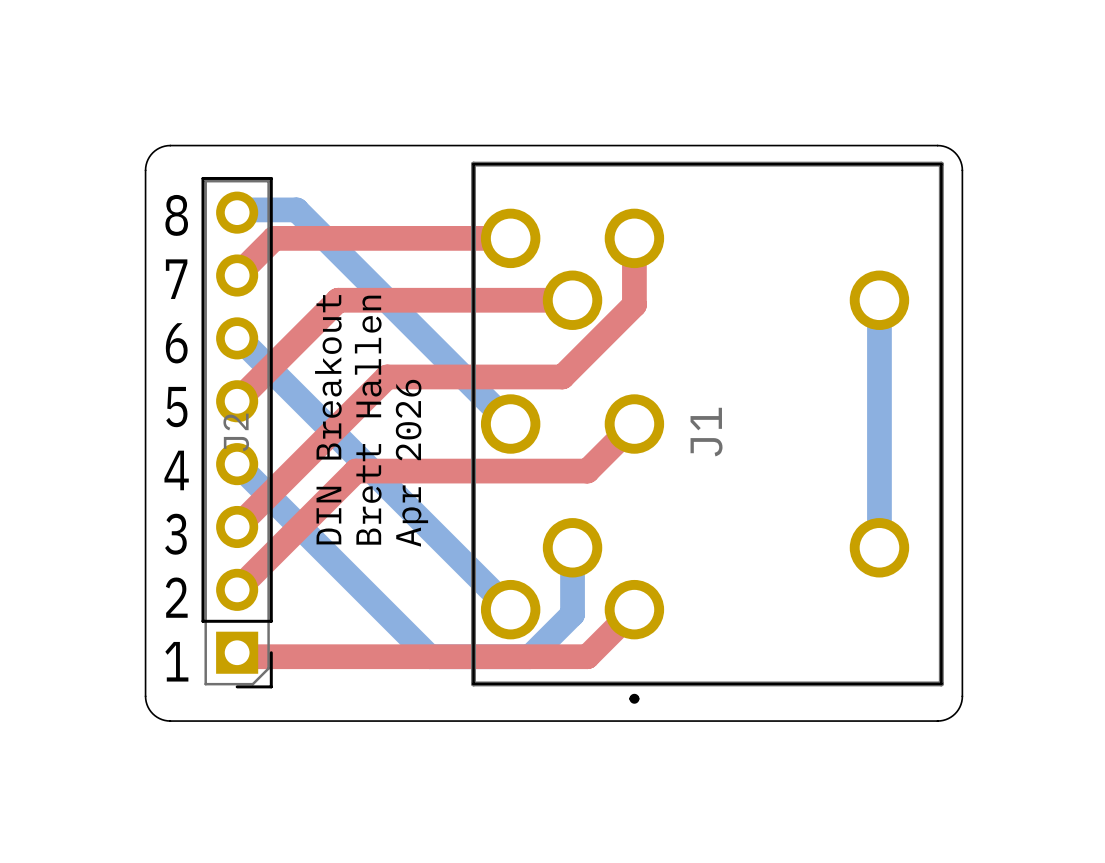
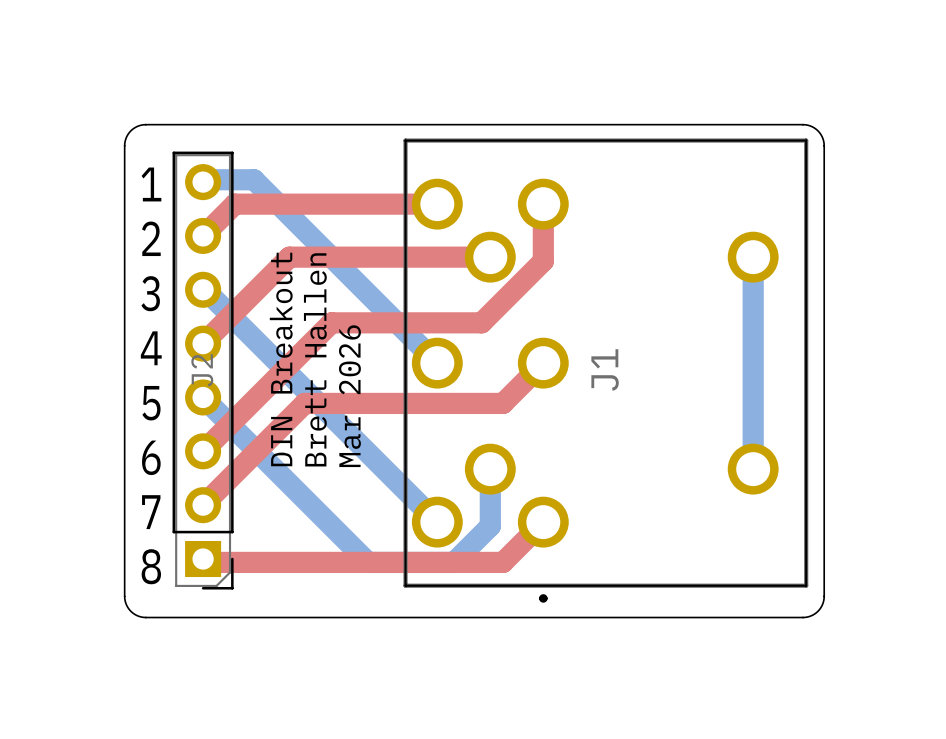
text: 8 (176, 215) -> 1 (151, 184)
text: 7 (176, 279) -> 2 (151, 238)
text: 6 (176, 343) -> 3 (150, 293)
text: 5 (176, 407) -> 4 (151, 348)
text: Apr 2026 (411, 463) -> Mar 2026 (349, 396)
text: 4 (176, 470) -> 5 (151, 403)
text: 3 (175, 534) -> 6 (151, 457)
text: 2 (176, 597) -> 7 (151, 512)
text: 1 (176, 661) -> 8 (151, 566)

